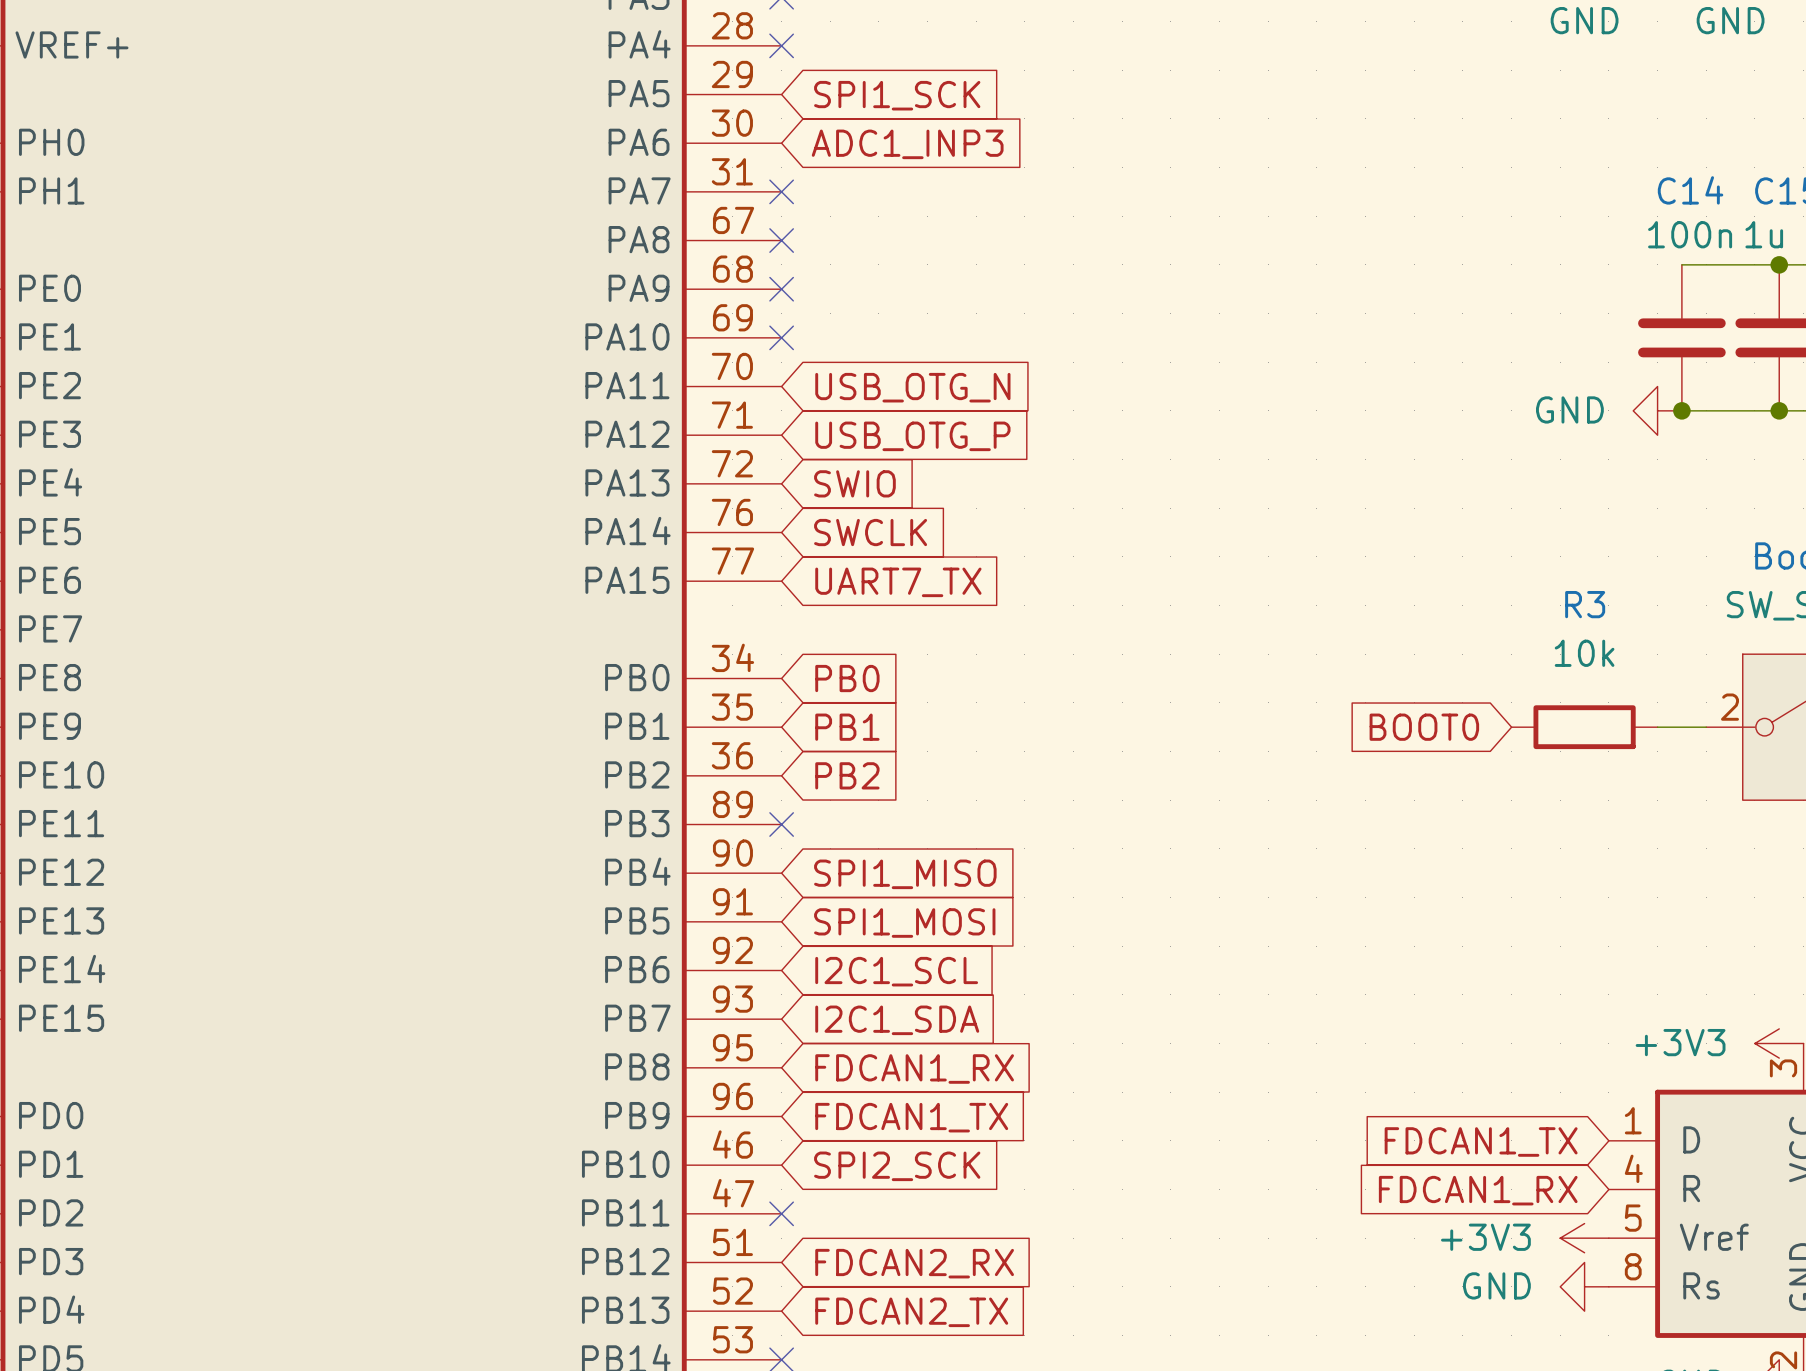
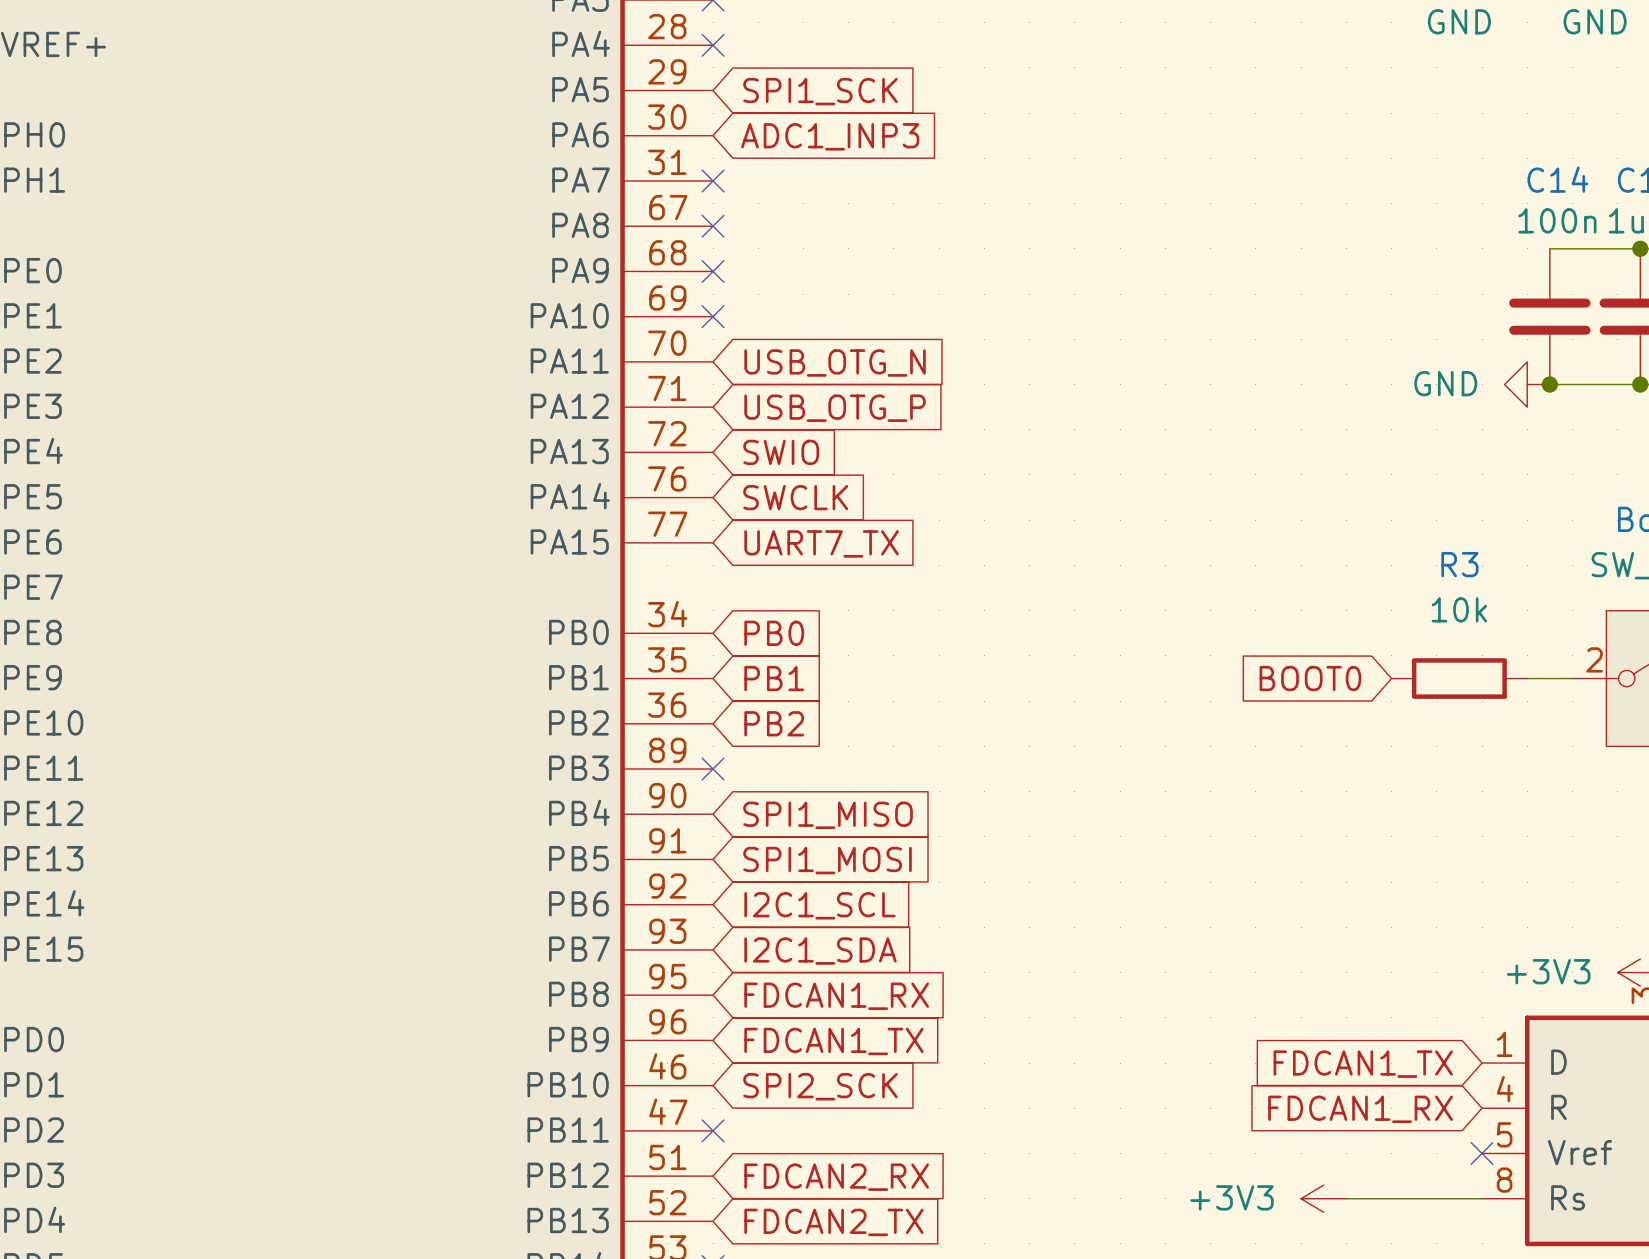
power symbol position: +3V3 (1584, 1238) -> +3V3 (1323, 1198)
no-connect mark: none -> (1482, 1153)
wire: none -> (1346, 1198) (1482, 1198)
power symbol: GND (1584, 1286) -> none

